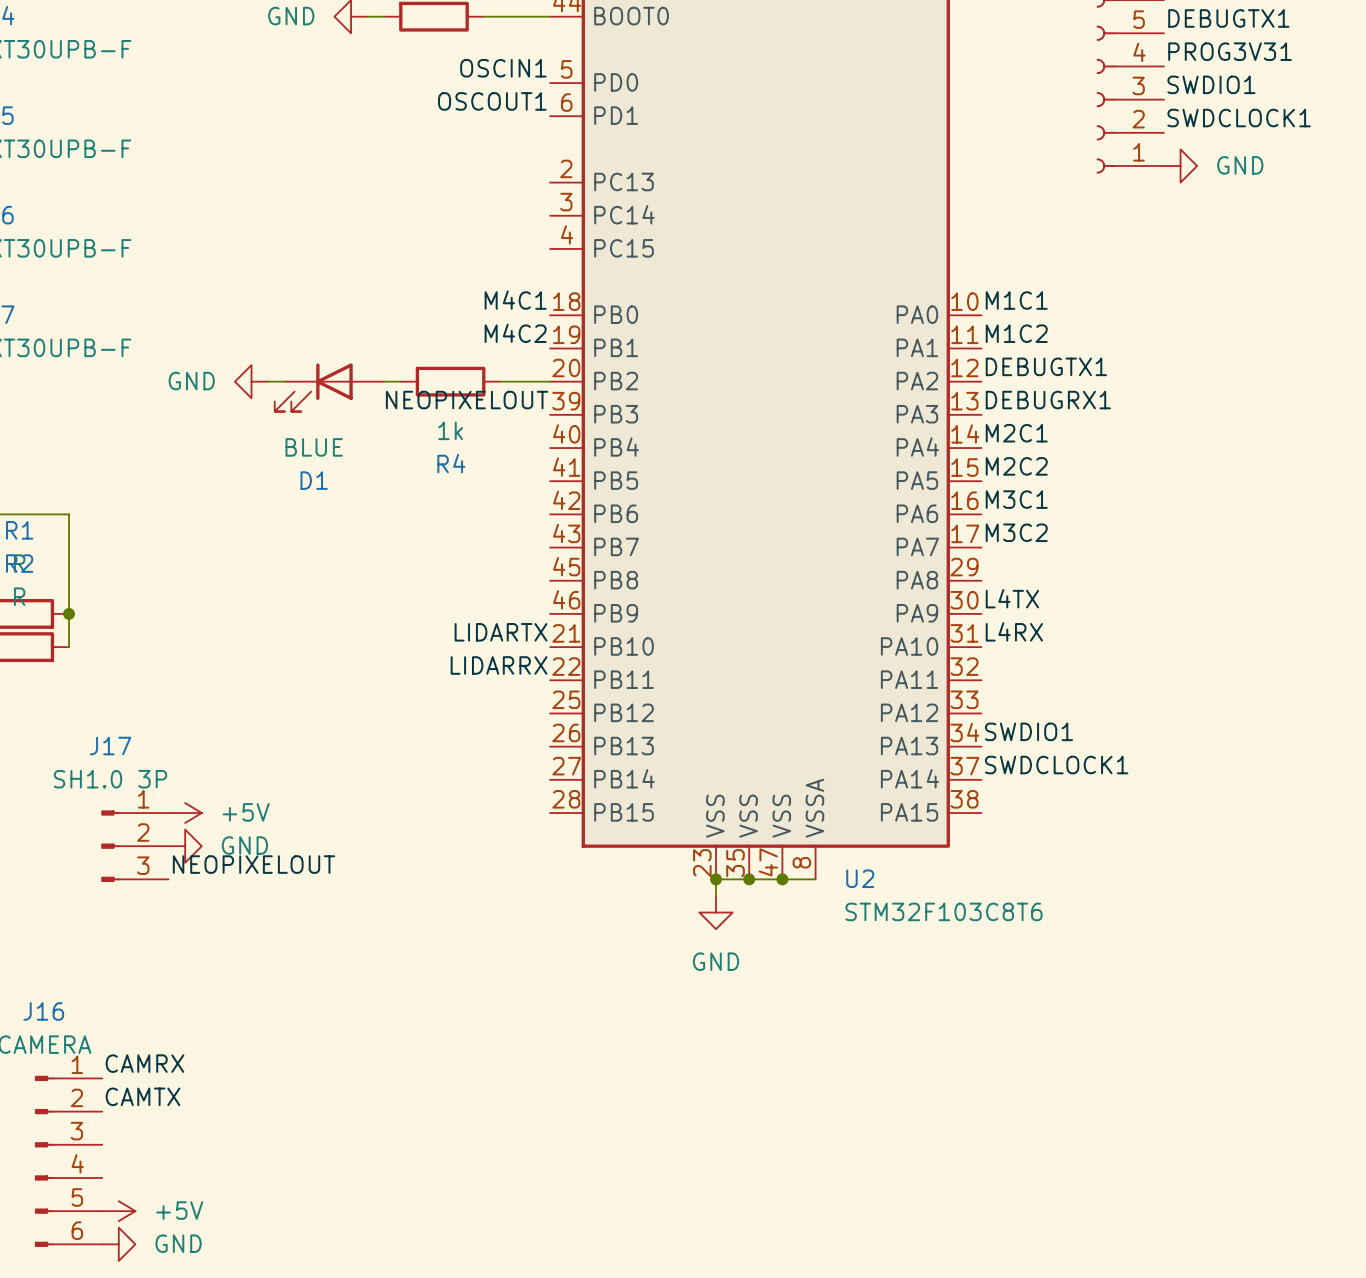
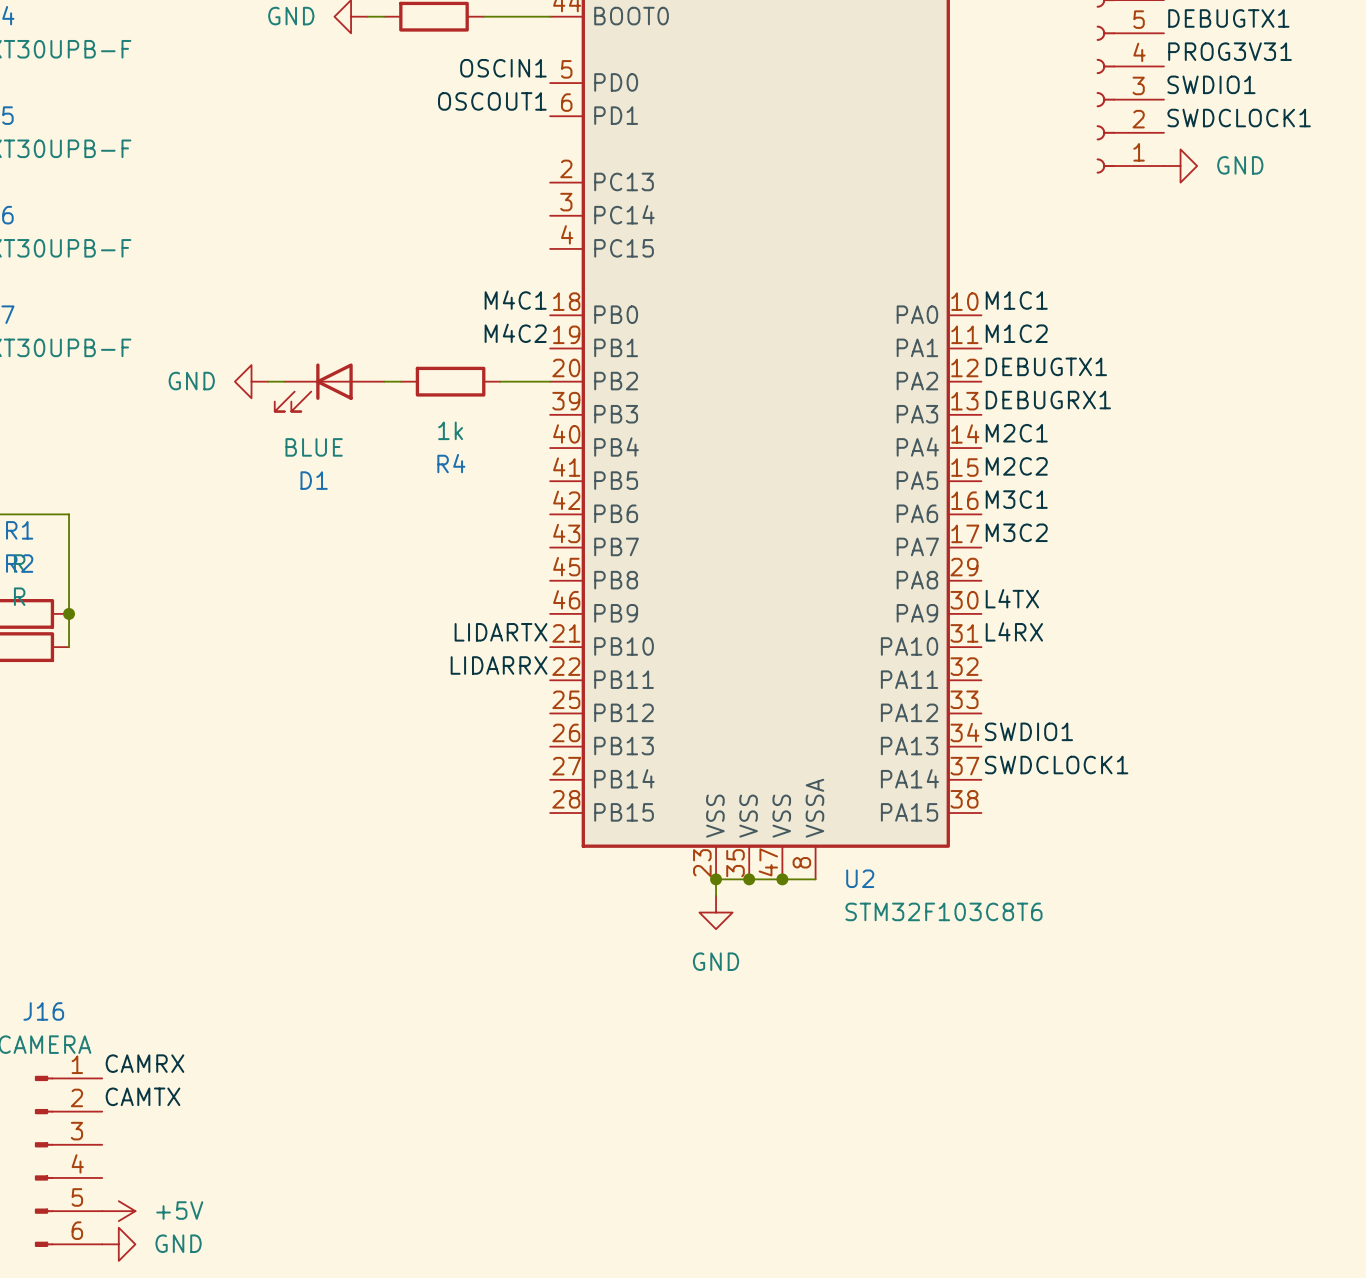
label: NEOPIXELOUT (467, 400) -> none
power symbol: +5V (185, 813) -> none
J17: SH1.0 3P (134, 846) -> none
power symbol: GND (185, 846) -> none
label: NEOPIXELOUT (254, 864) -> none

